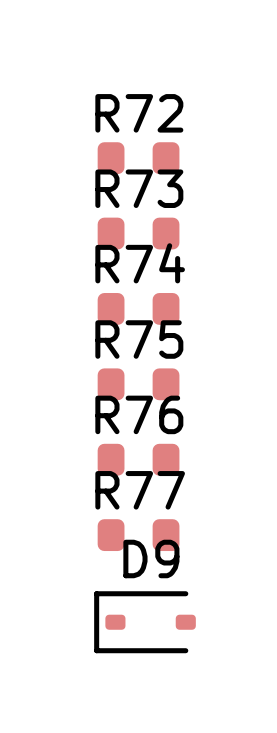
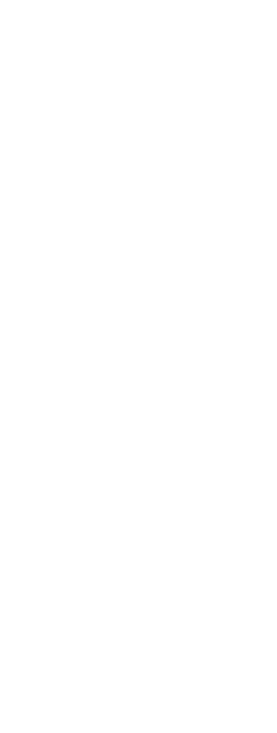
R72: (138, 158) -> none
R73: (138, 233) -> none
R74: (138, 308) -> none
R75: (138, 384) -> none
R76: (138, 459) -> none
R77: (138, 535) -> none
D9: (144, 622) -> none

